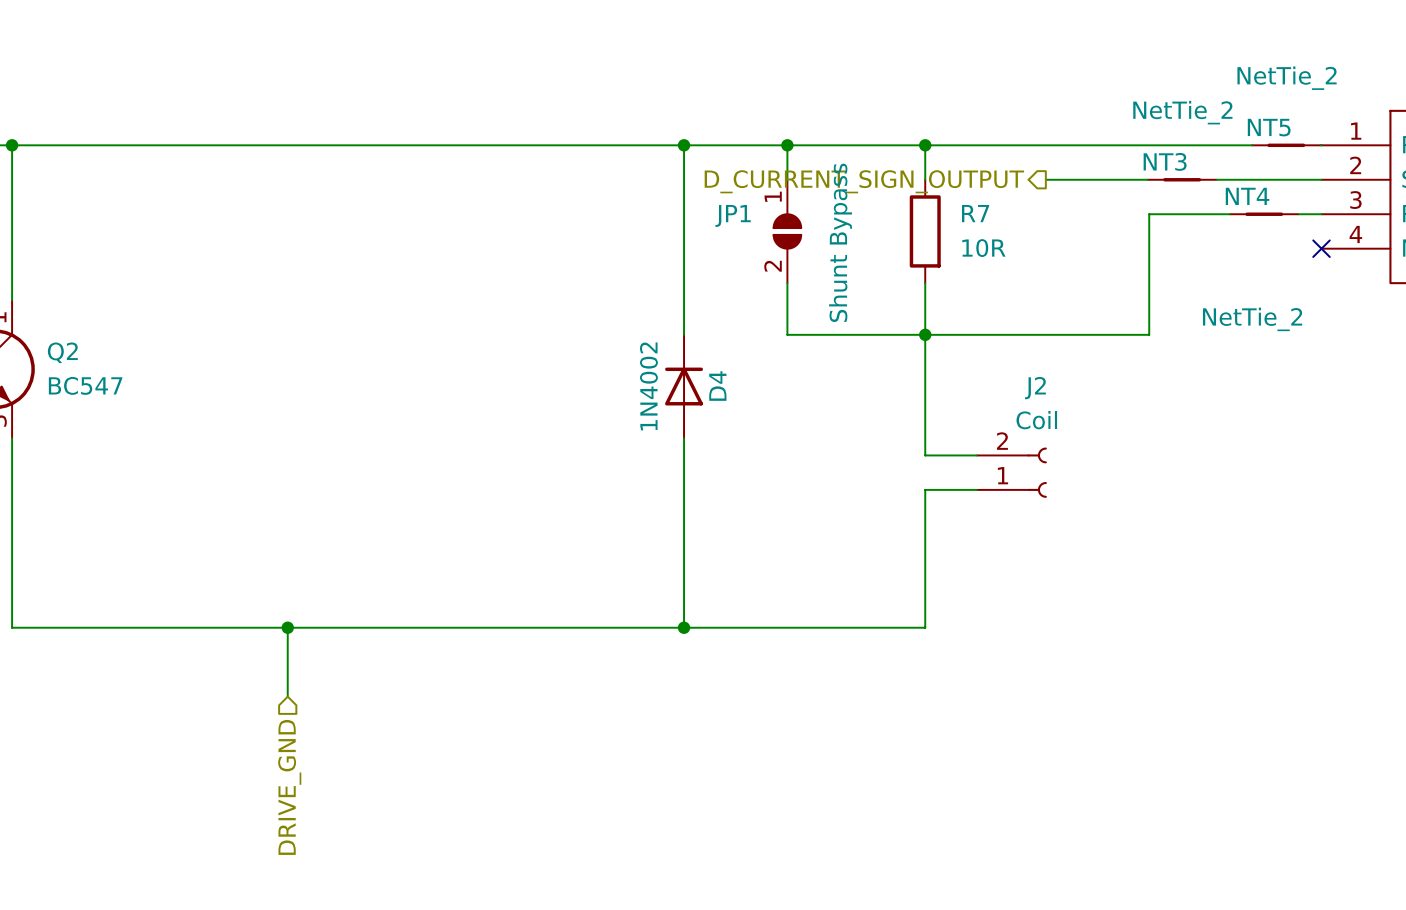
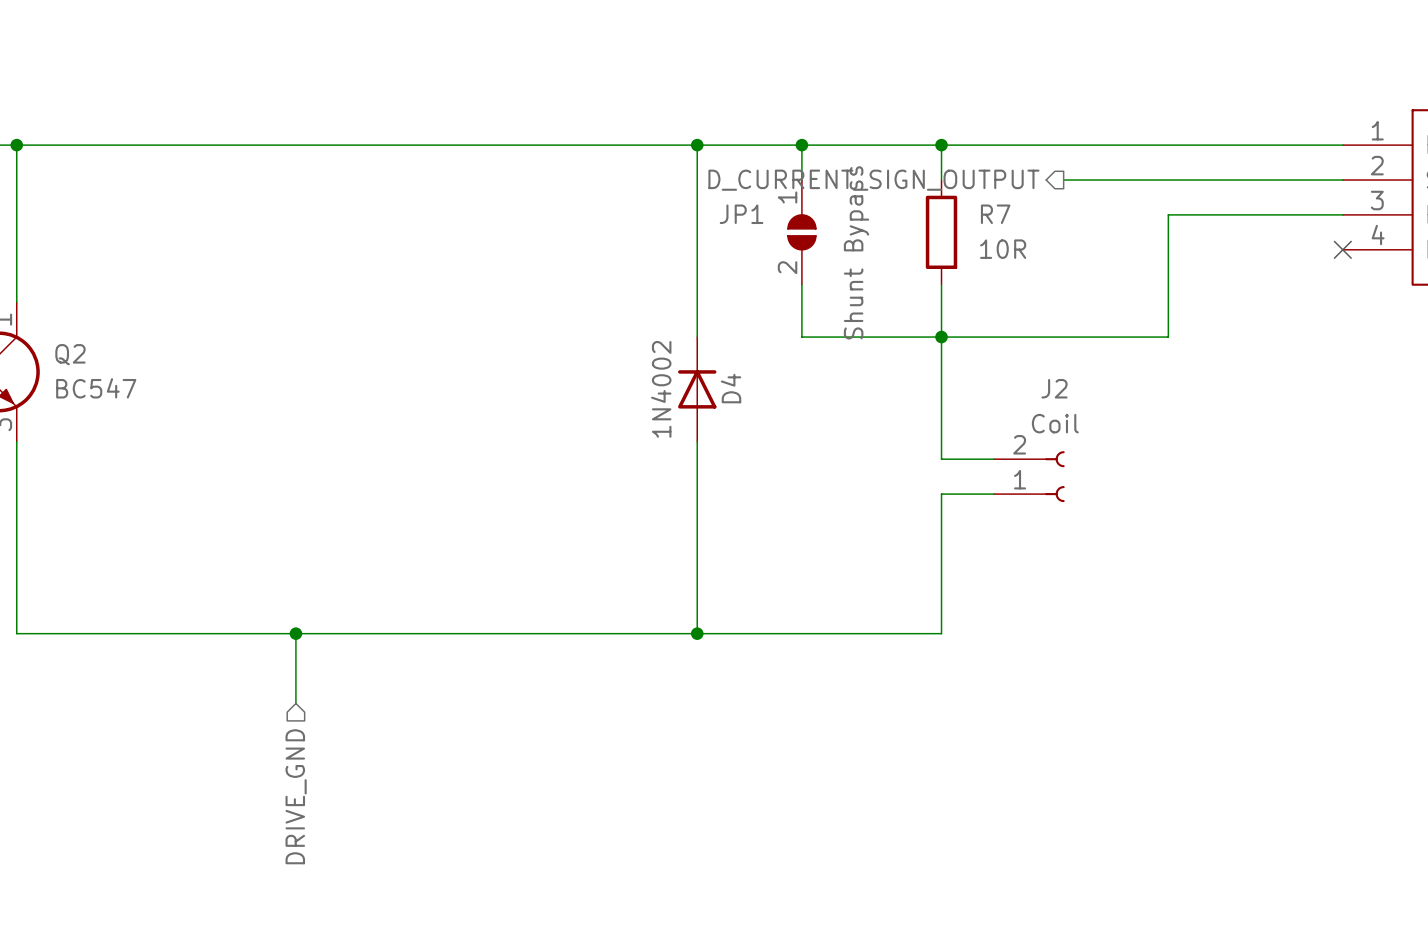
NT5: NetTie_2 (1286, 145) -> none
NT3: NetTie_2 (1182, 179) -> none
NT4: NetTie_2 (1264, 214) -> none

